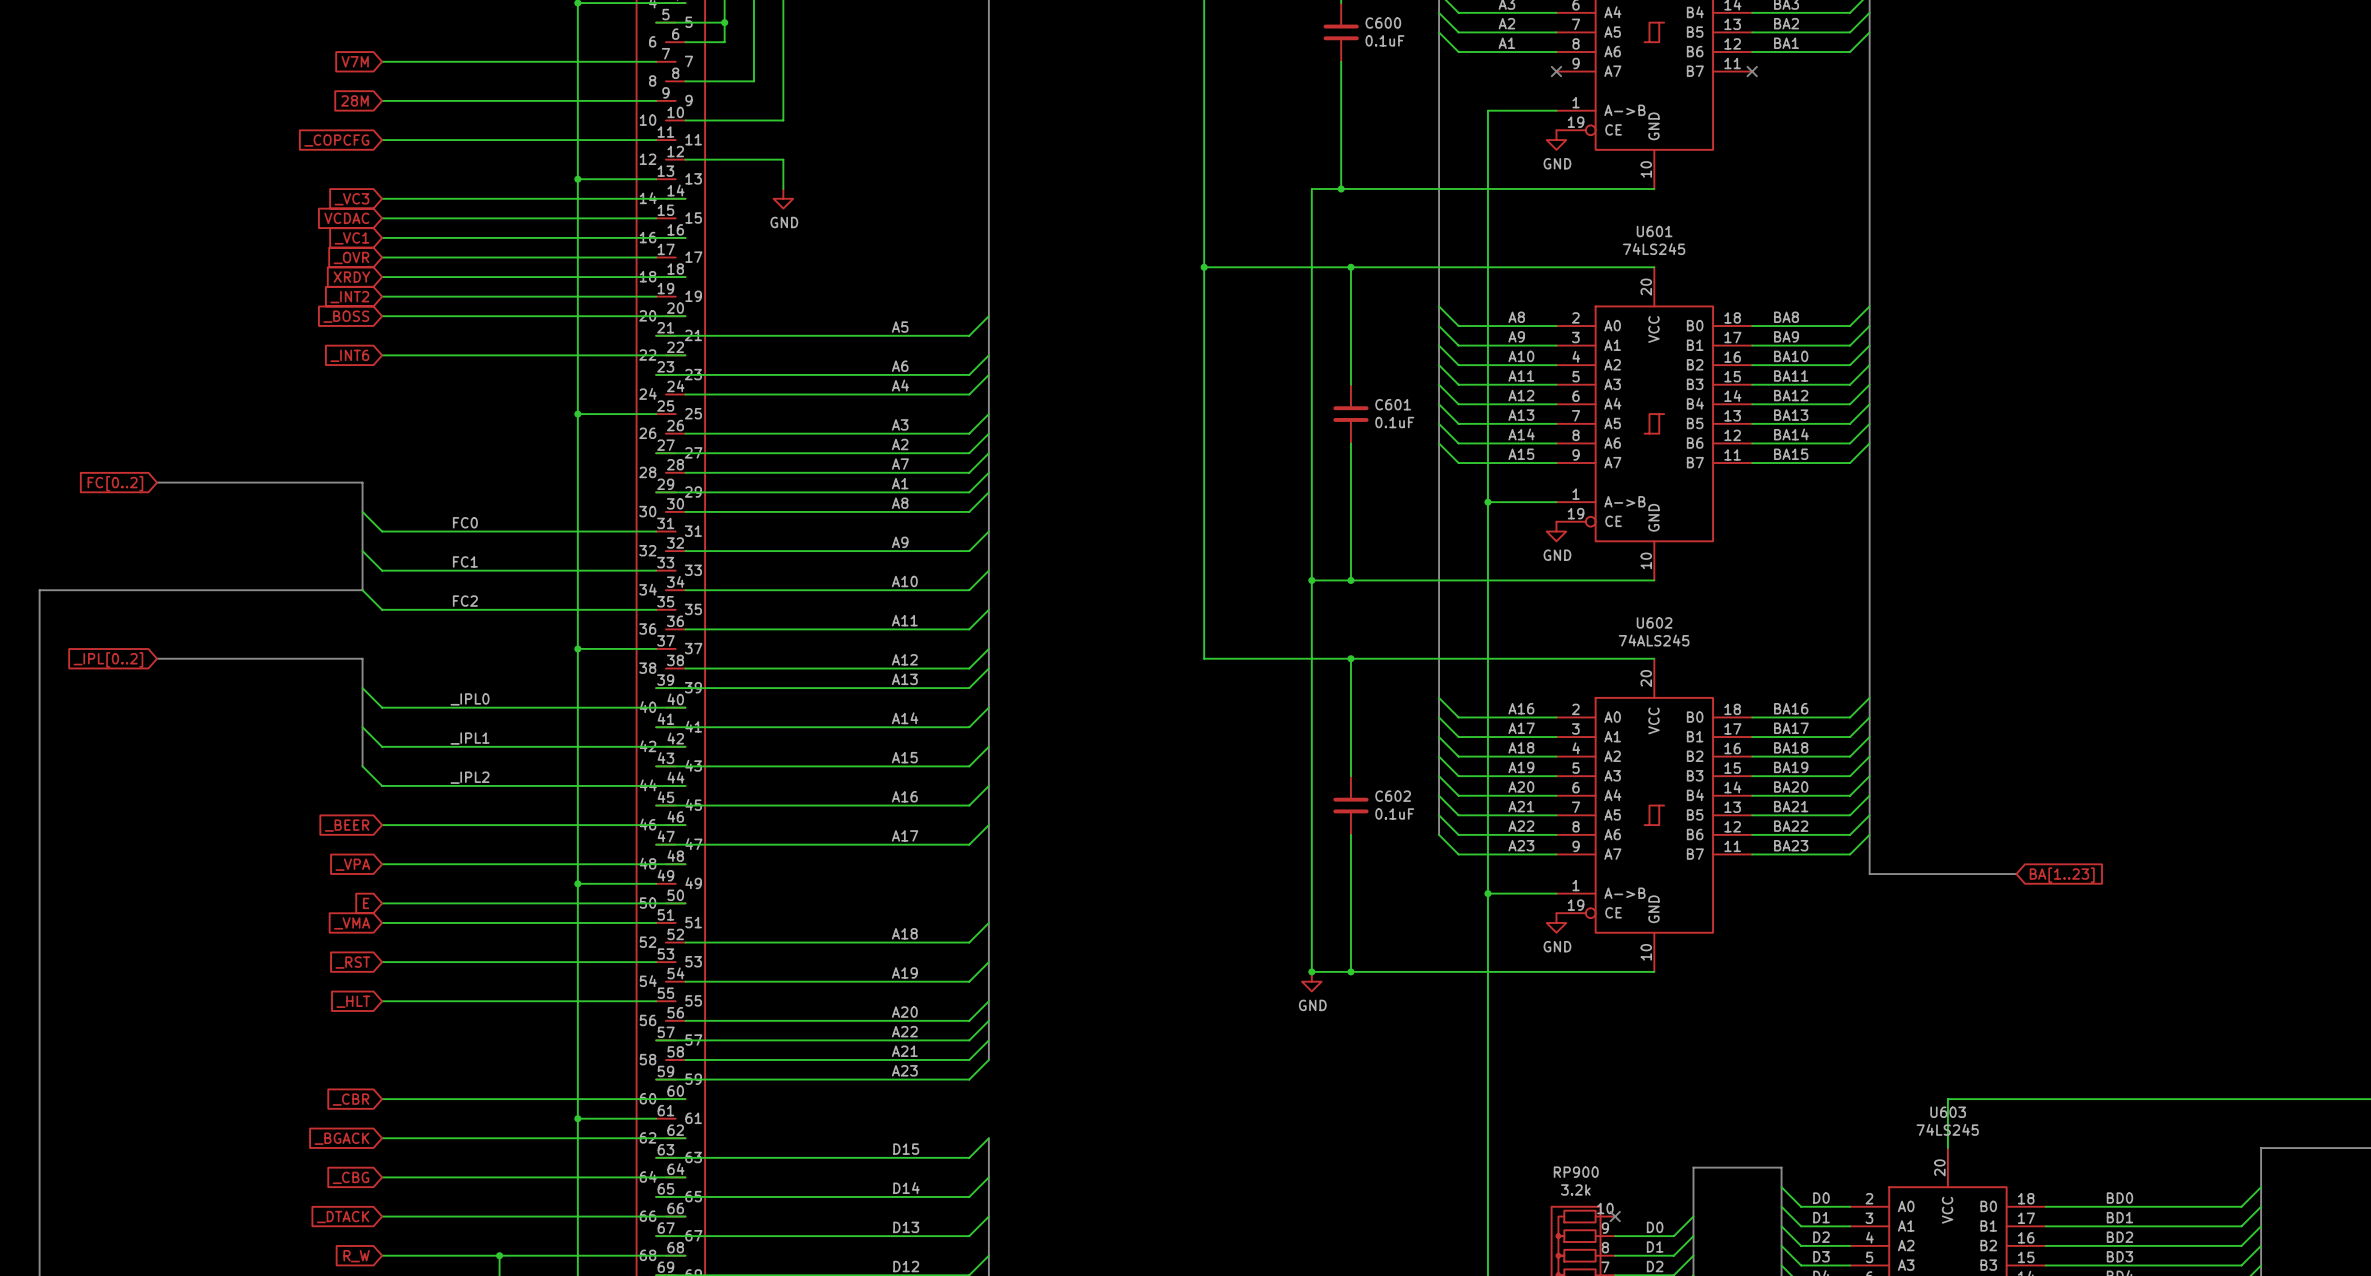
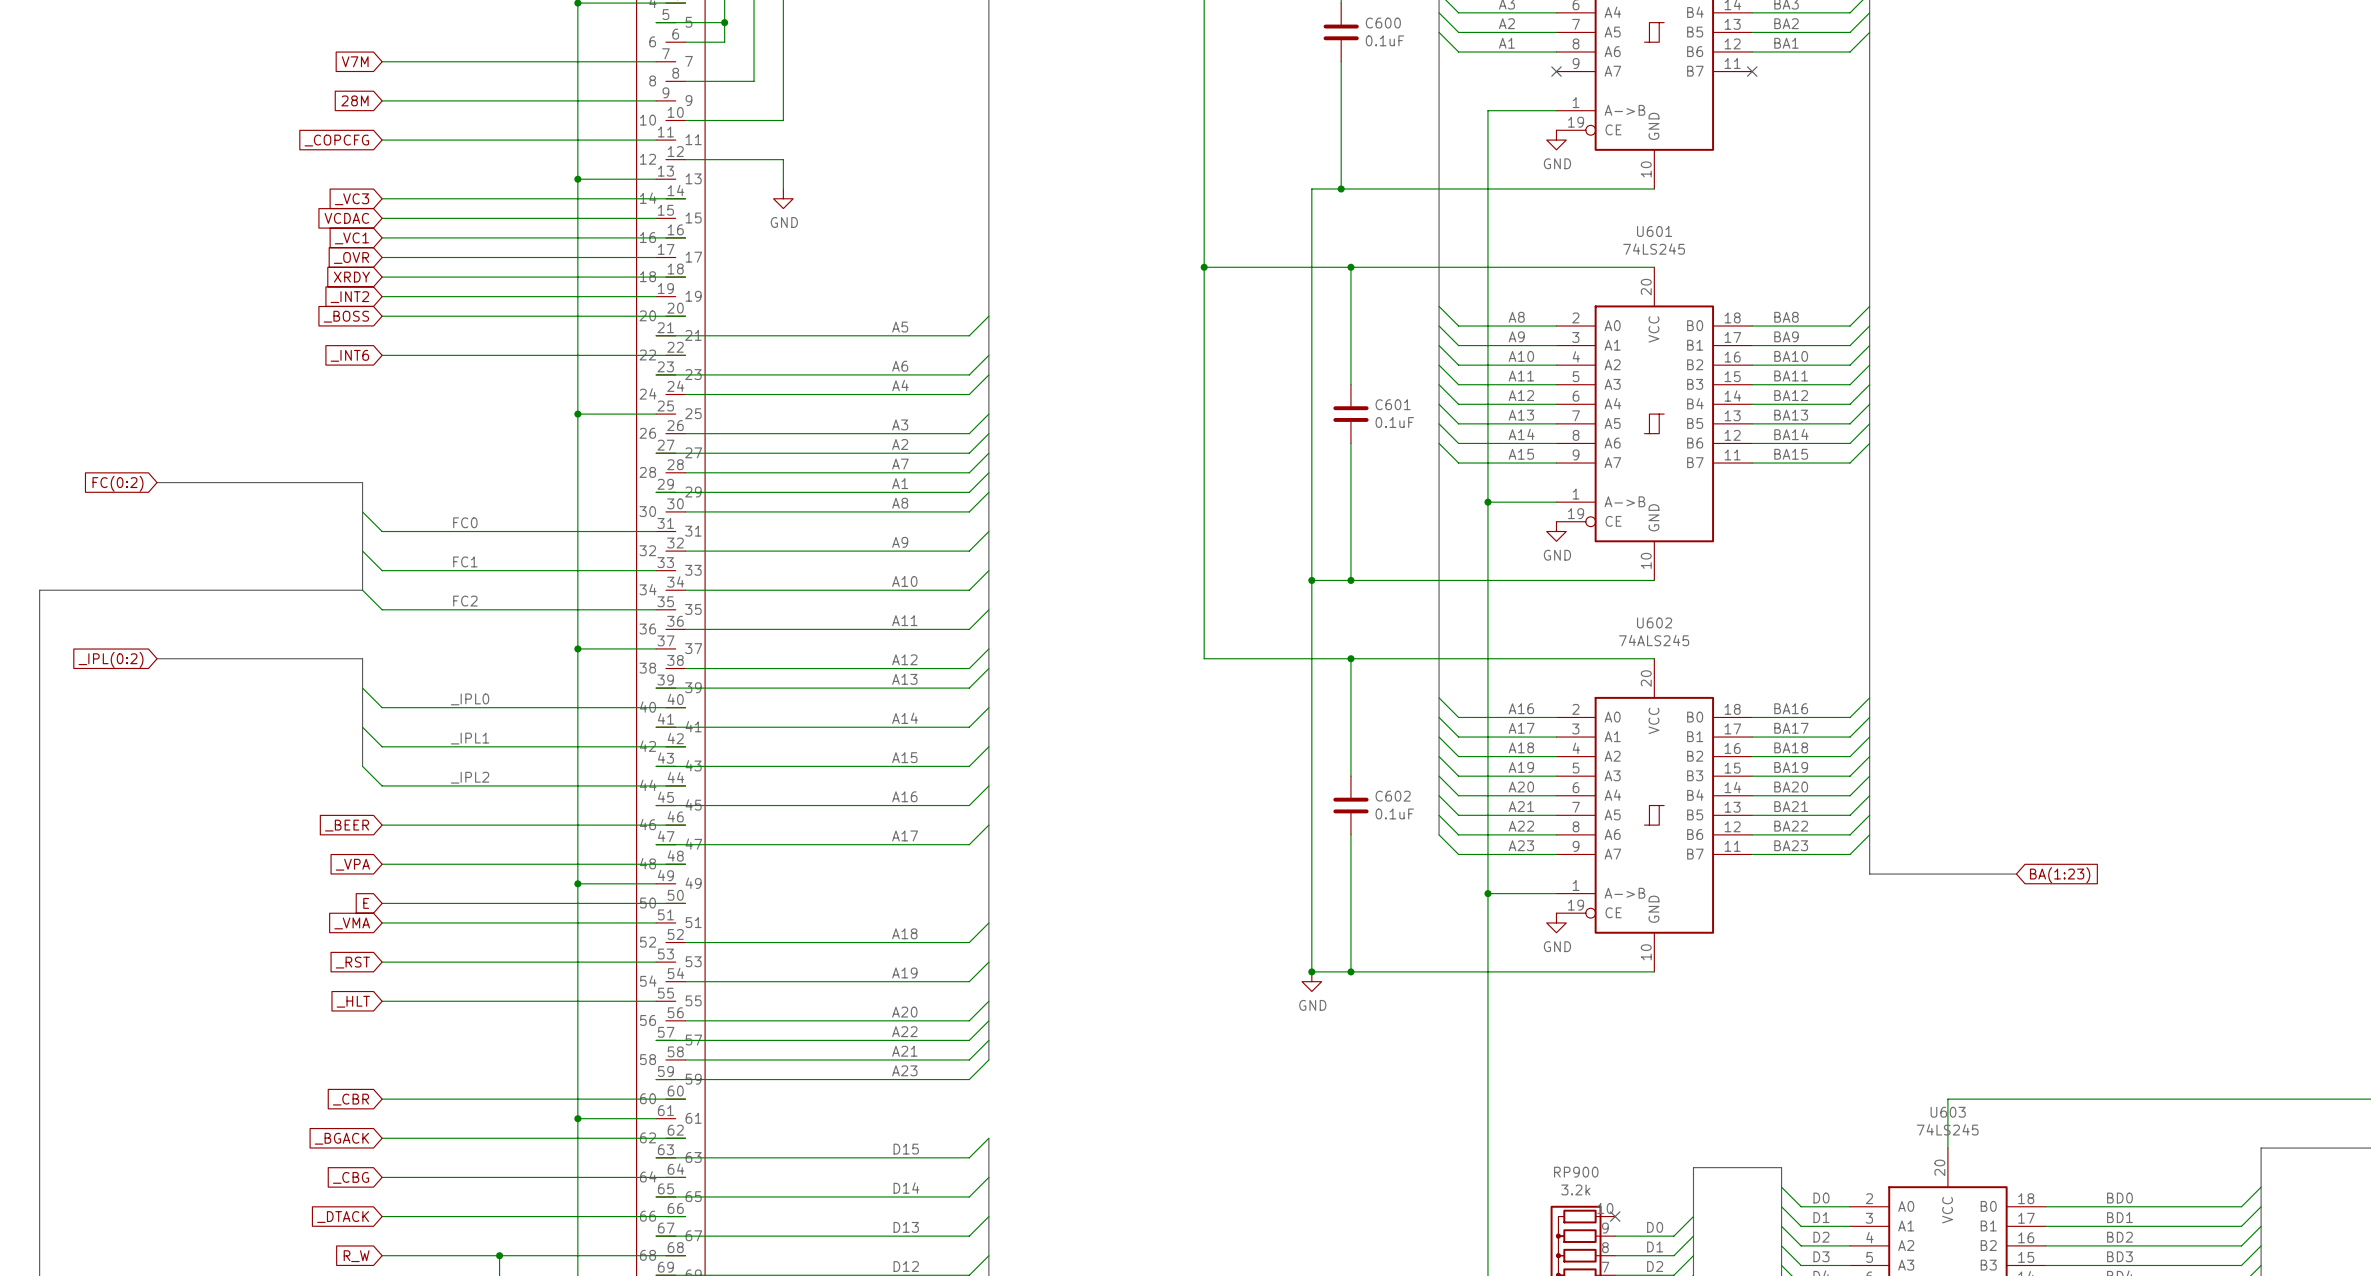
global label: FC[0..2] (115, 483) -> FC(0:2) (118, 483)
global label: _IPL[0..2] (108, 659) -> _IPL(0:2) (111, 659)
global label: BA[1..23] (2062, 875) -> BA(1:23) (2060, 875)

